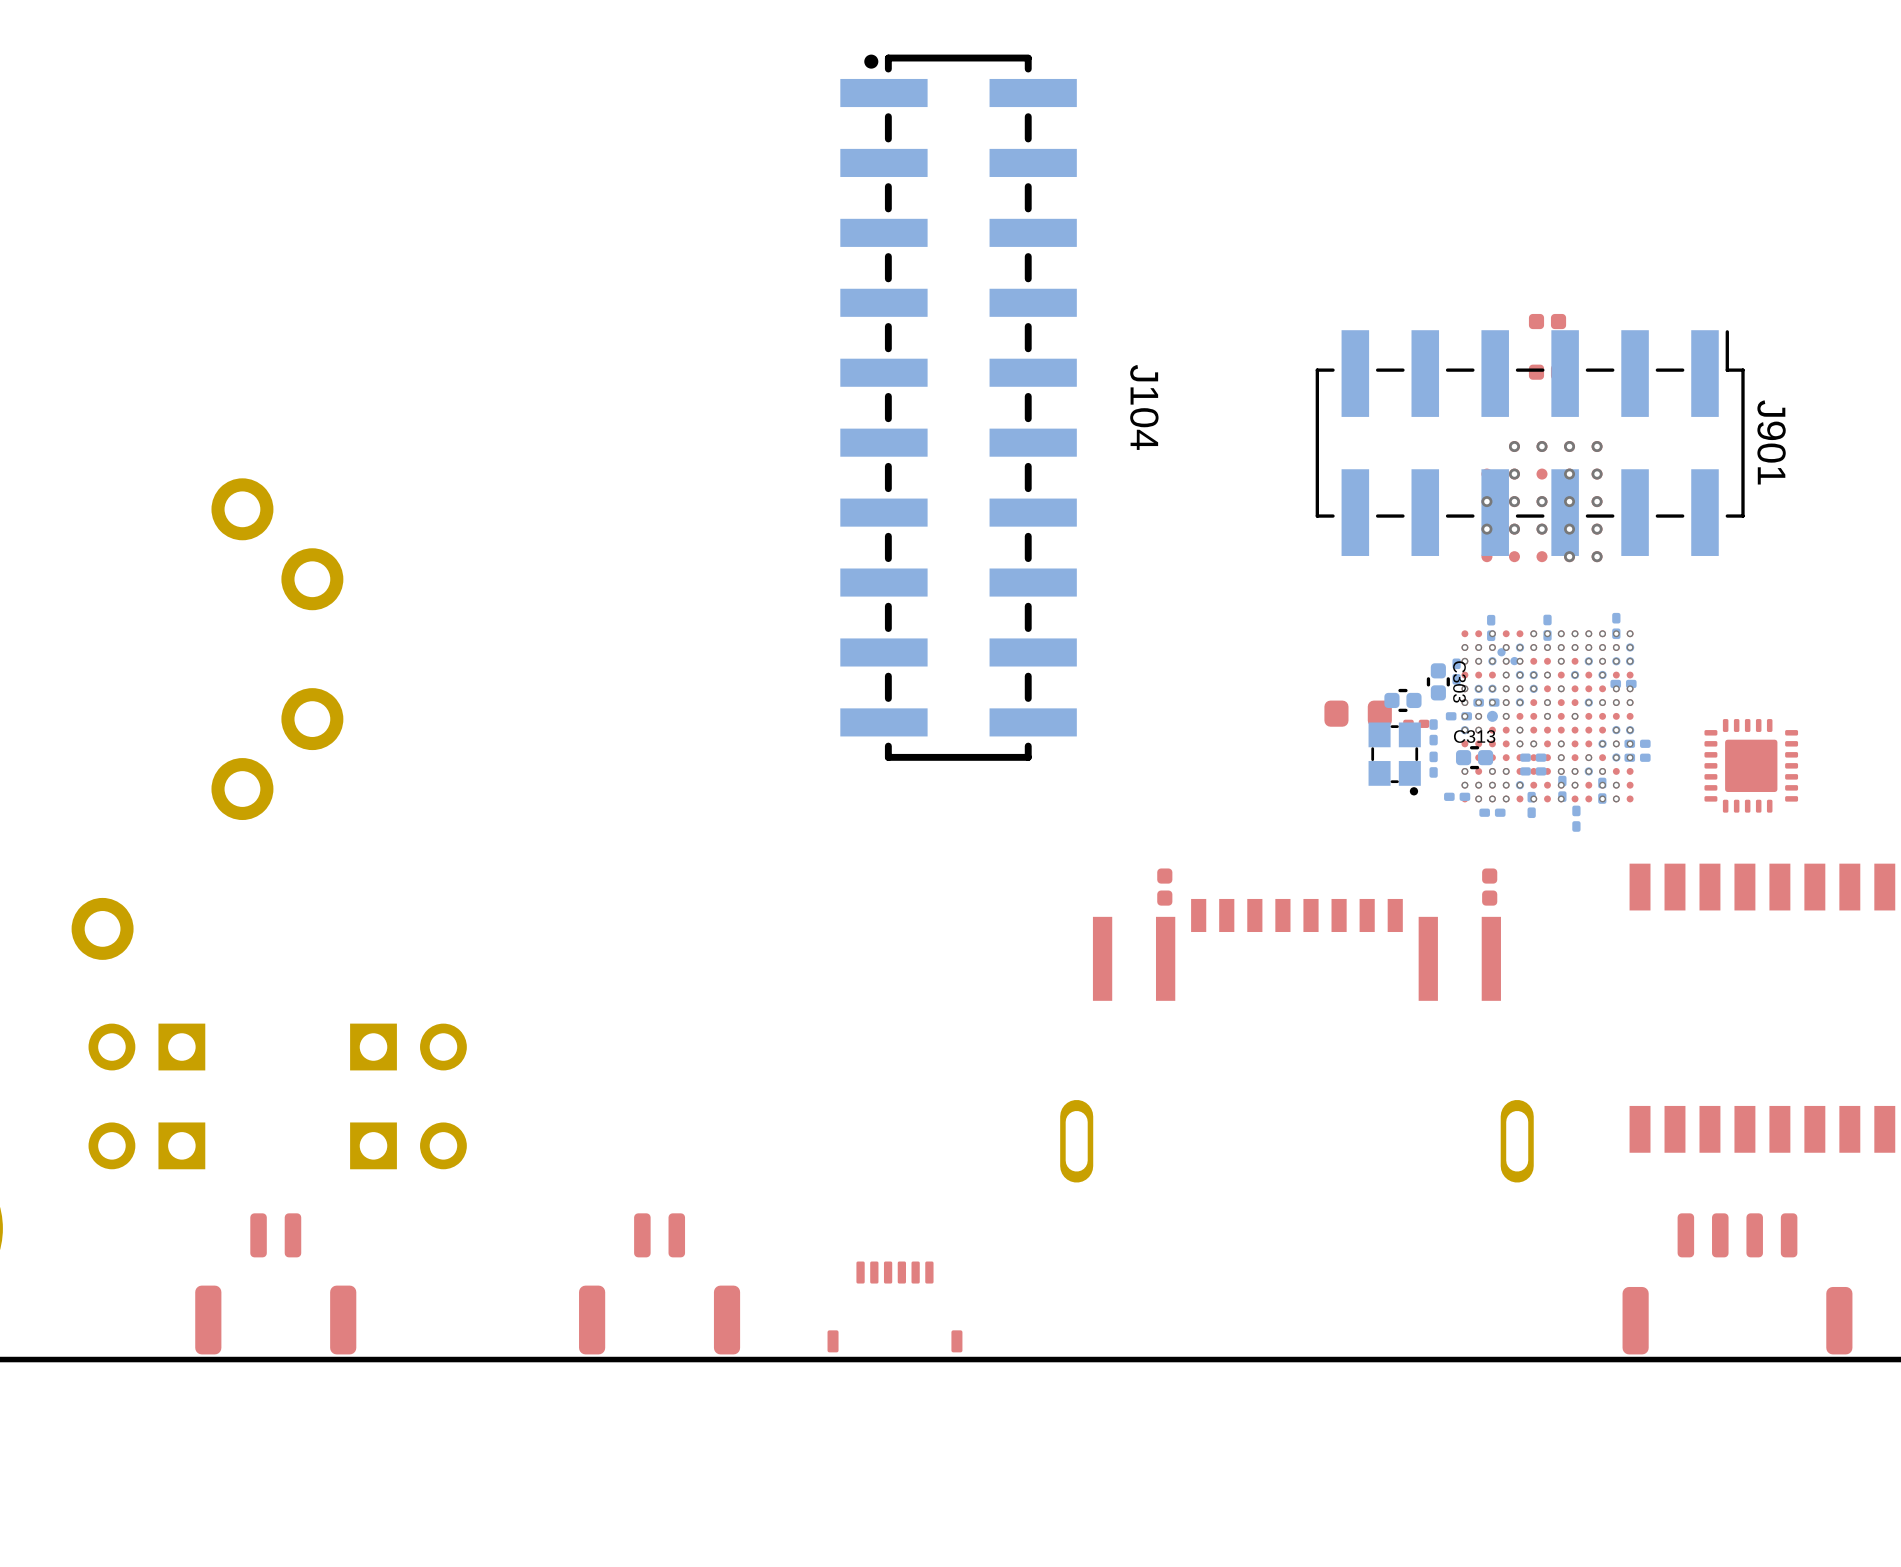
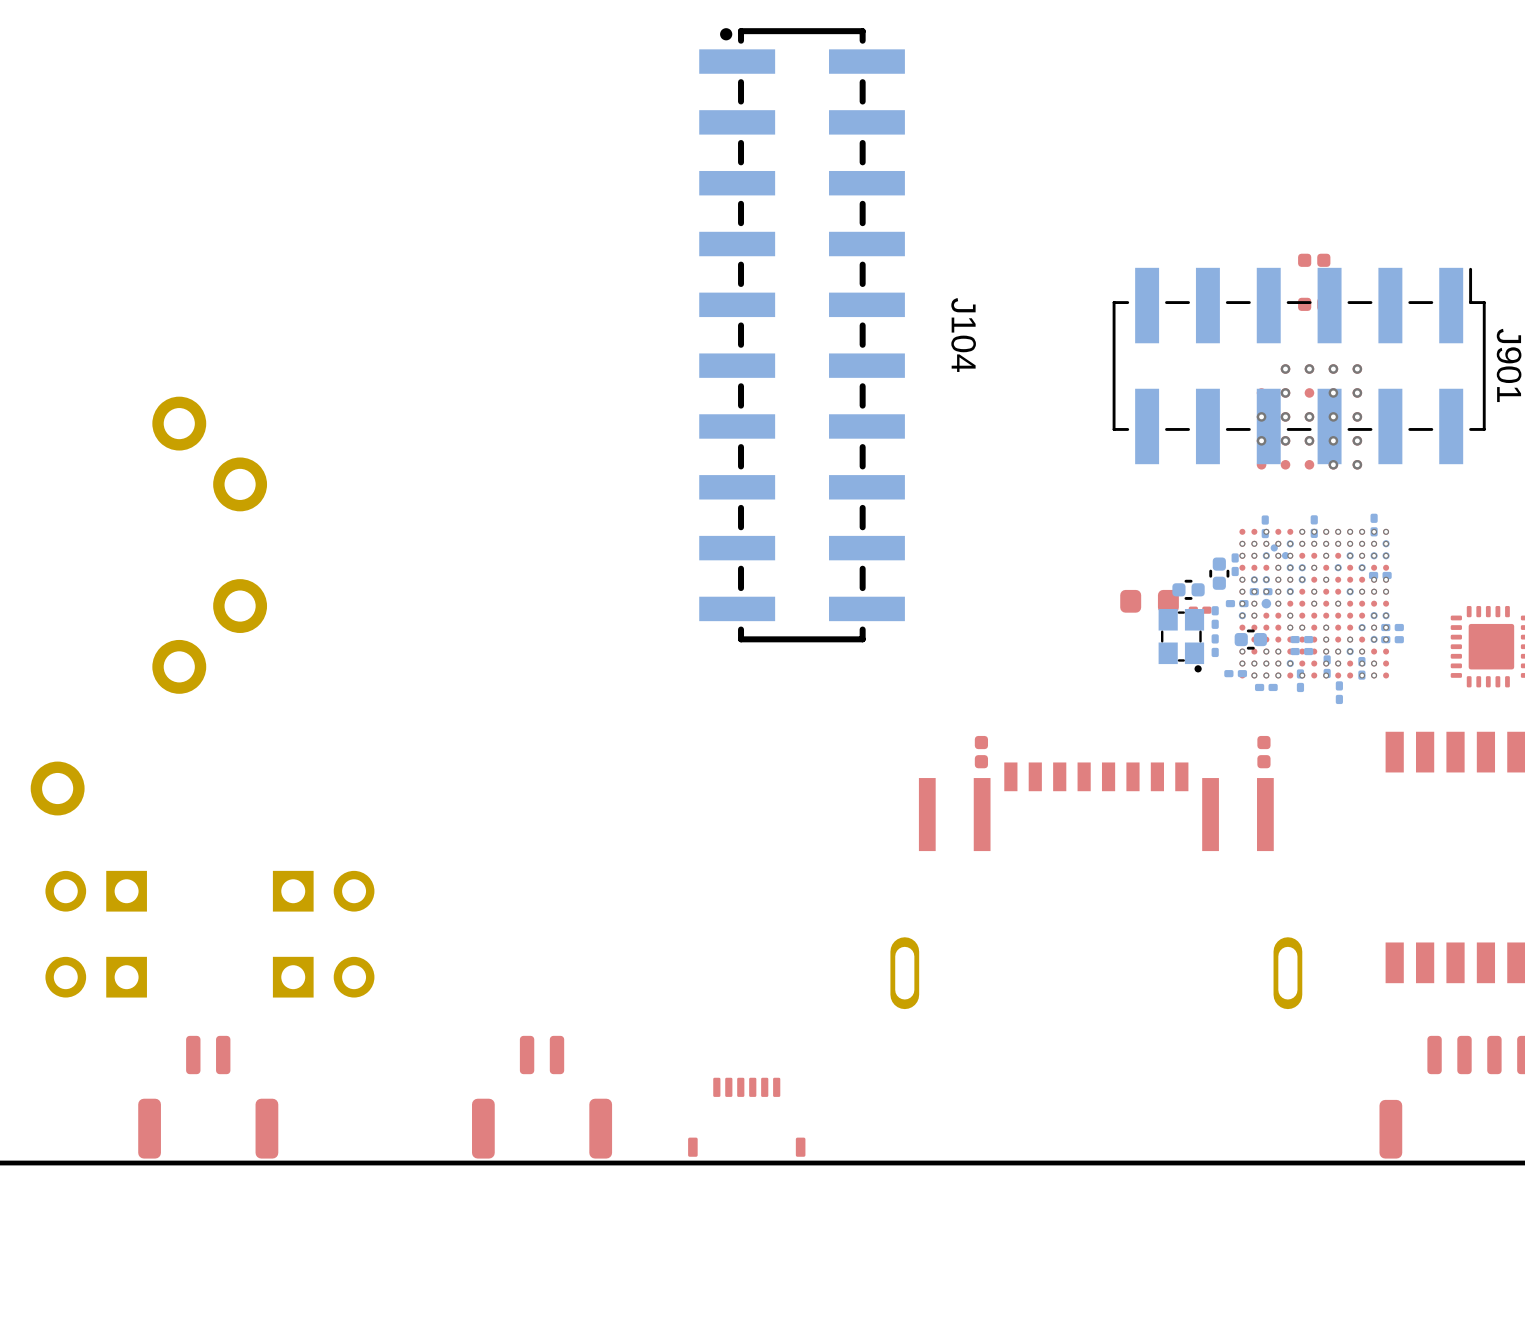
C303 name: C303 (1459, 681) -> none
C313 name: C313 (1474, 736) -> none

